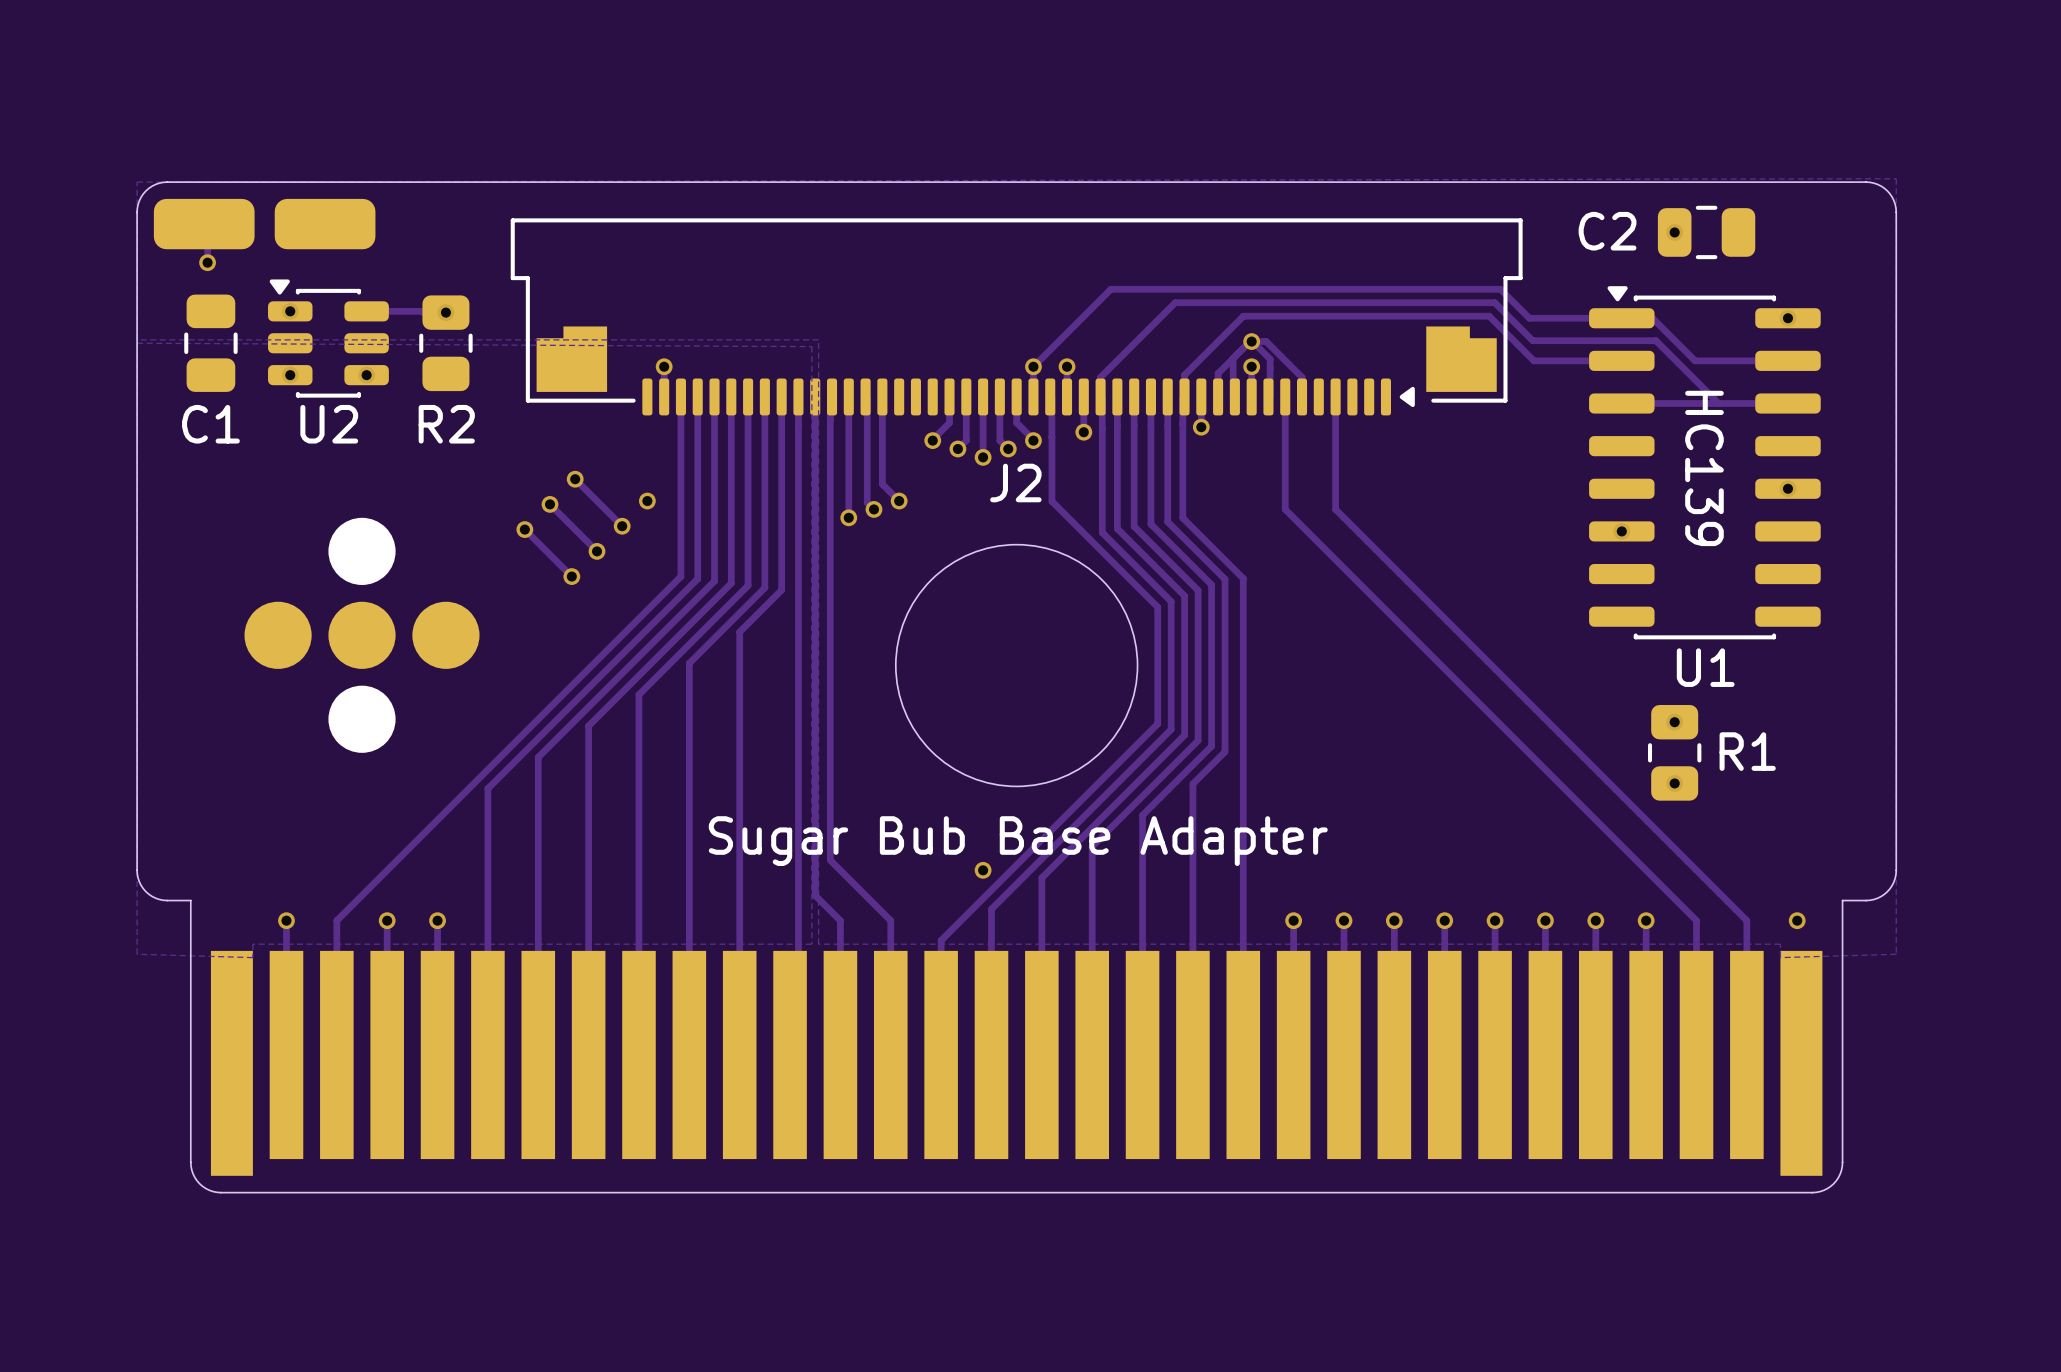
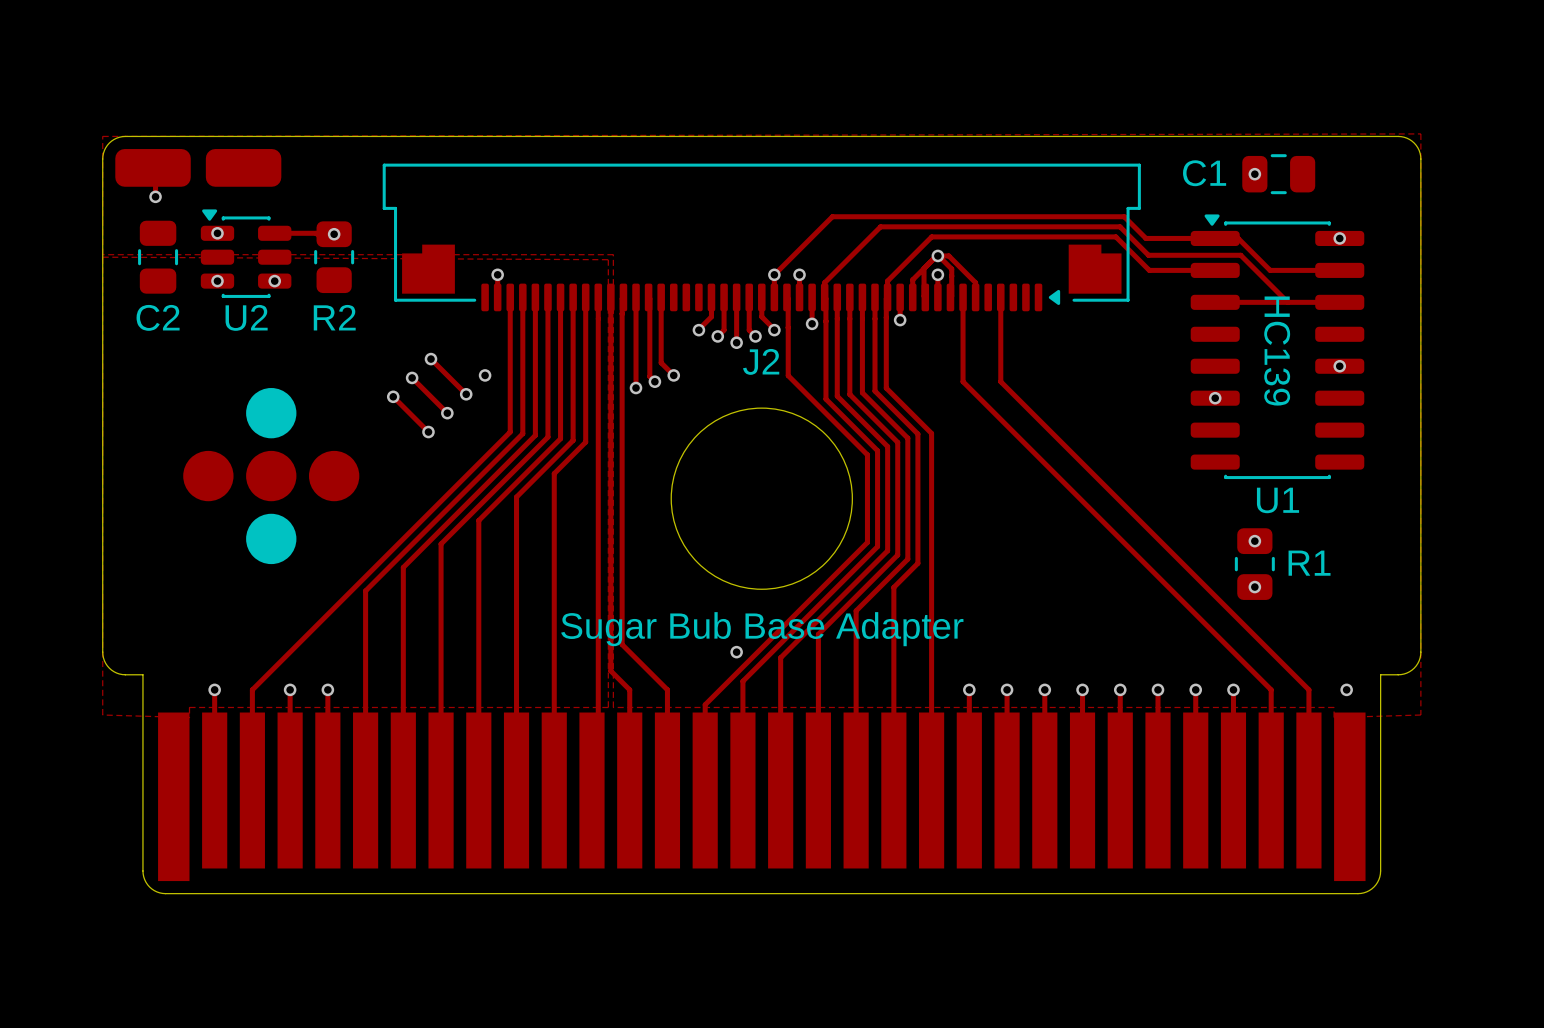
C2 name: C2 (1607, 231) -> C1 (1204, 173)
C1 name: C1 (210, 424) -> C2 (158, 317)

